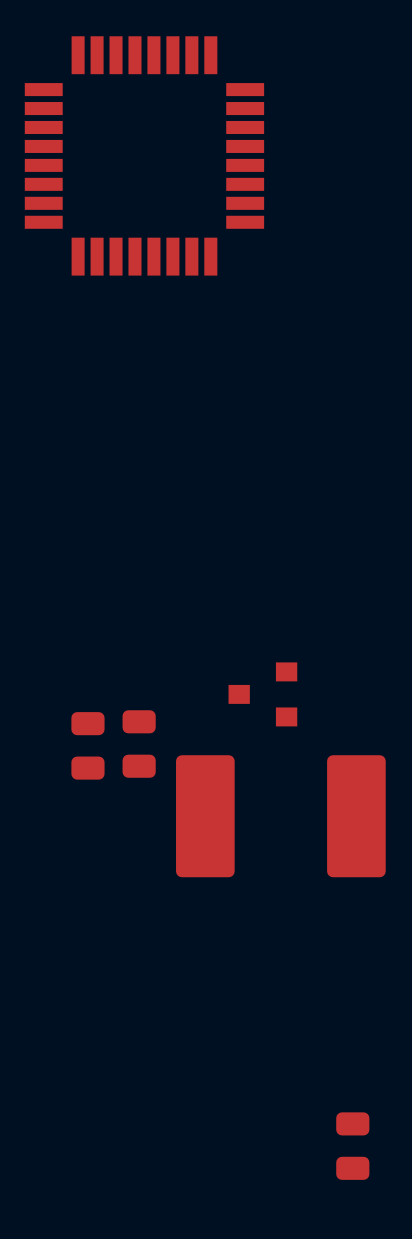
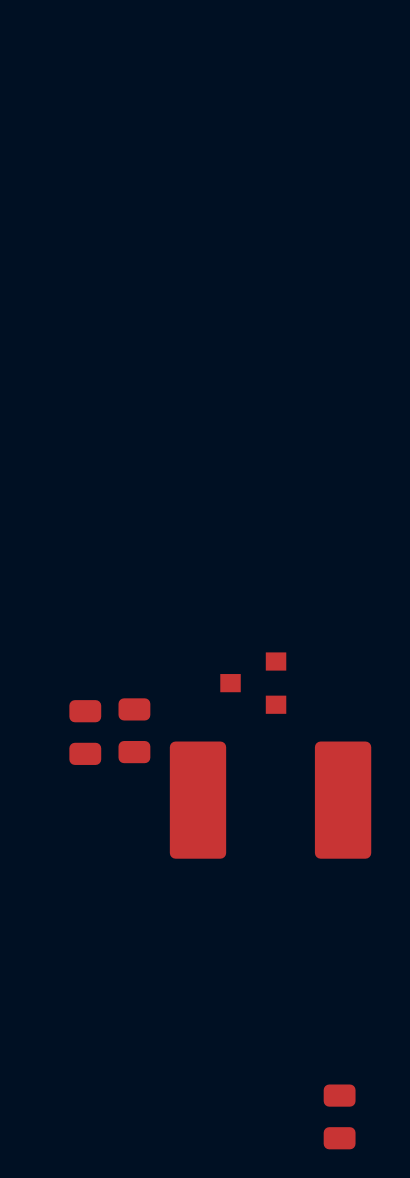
part: (144, 155) -> none

